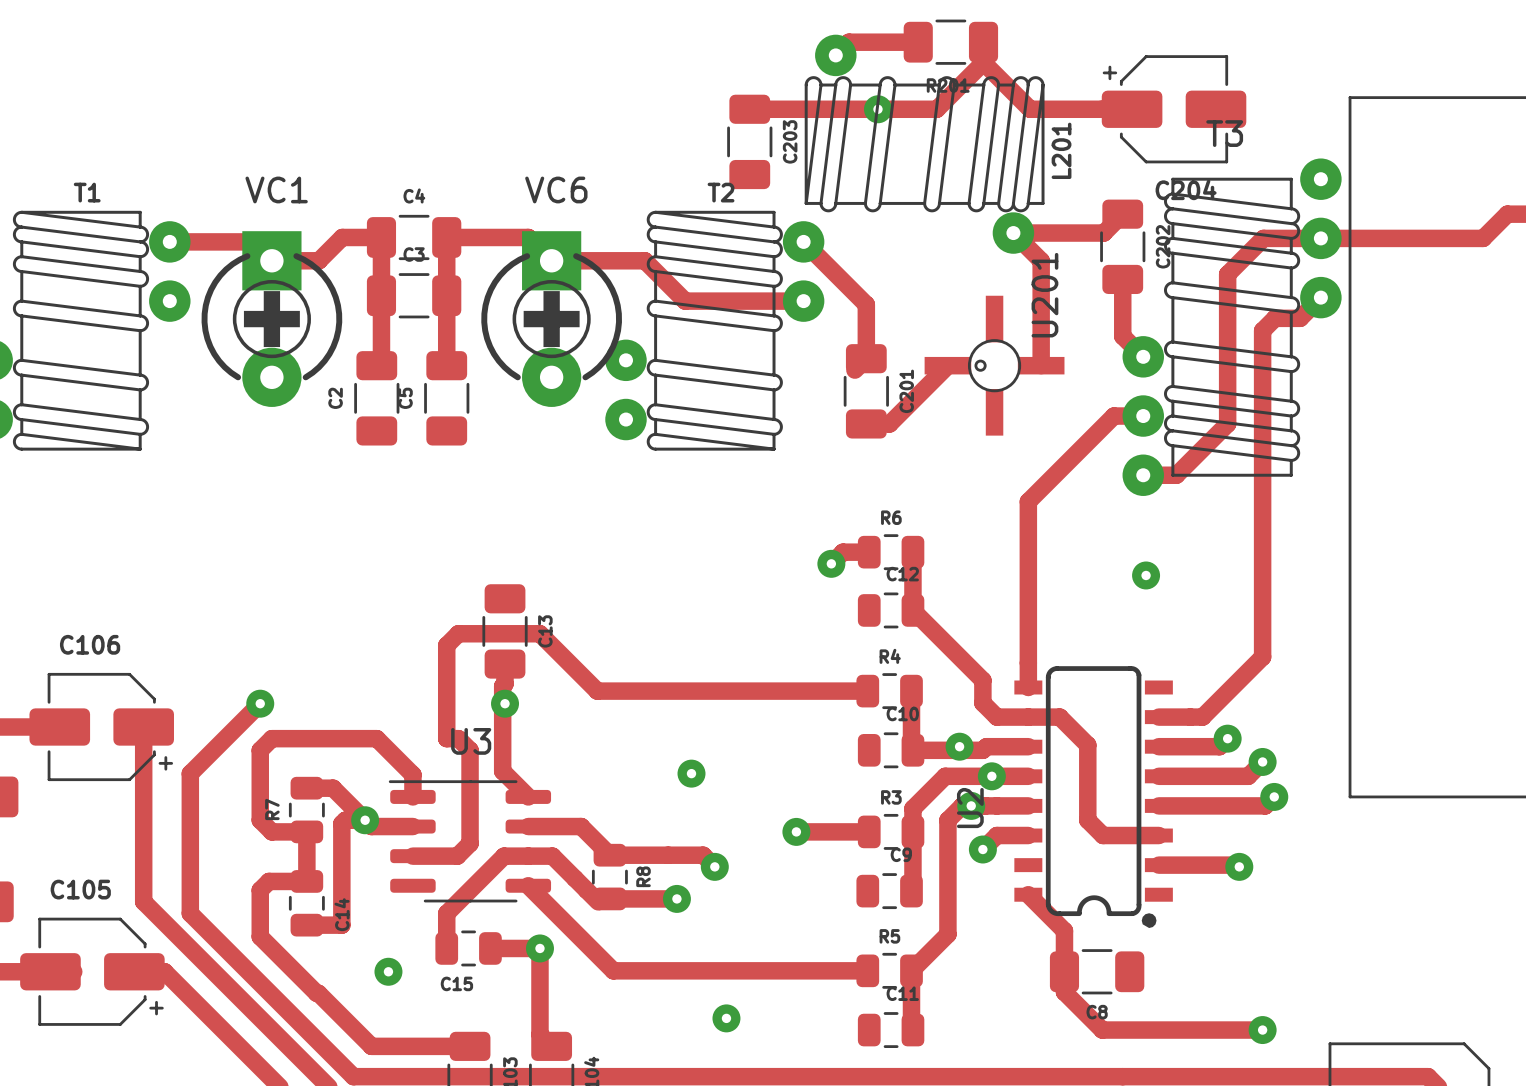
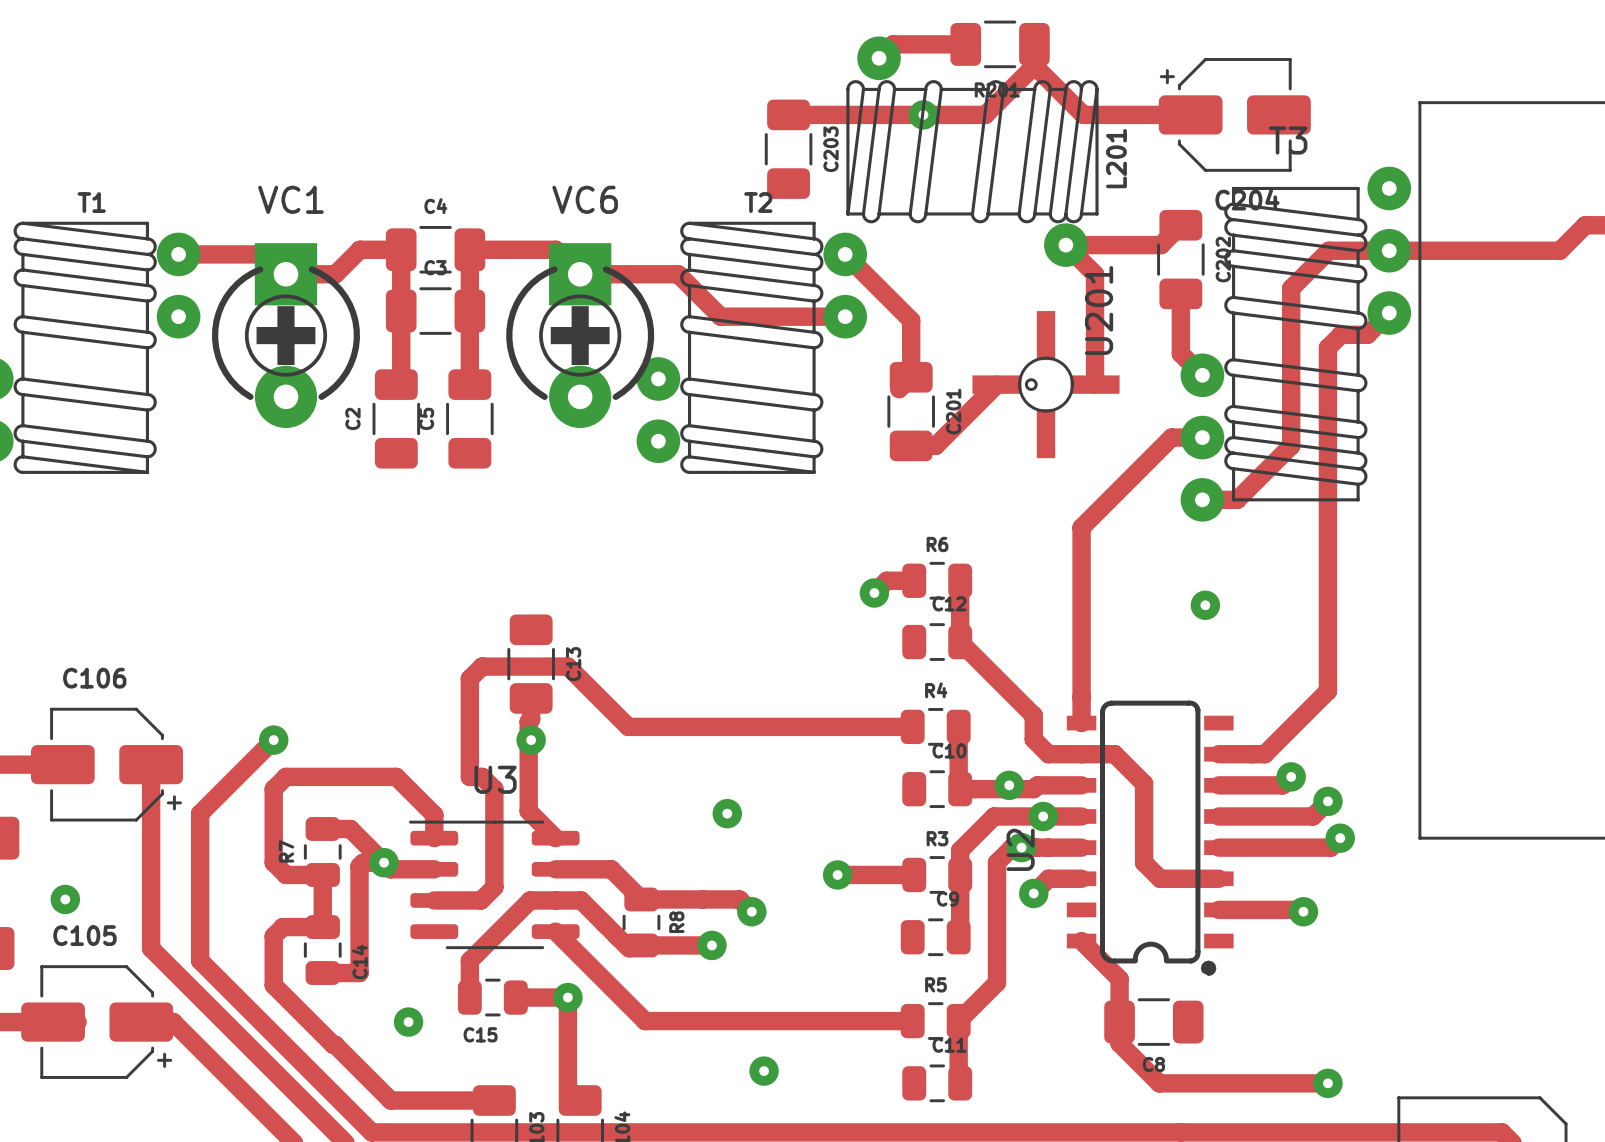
via: none -> (65, 899)

